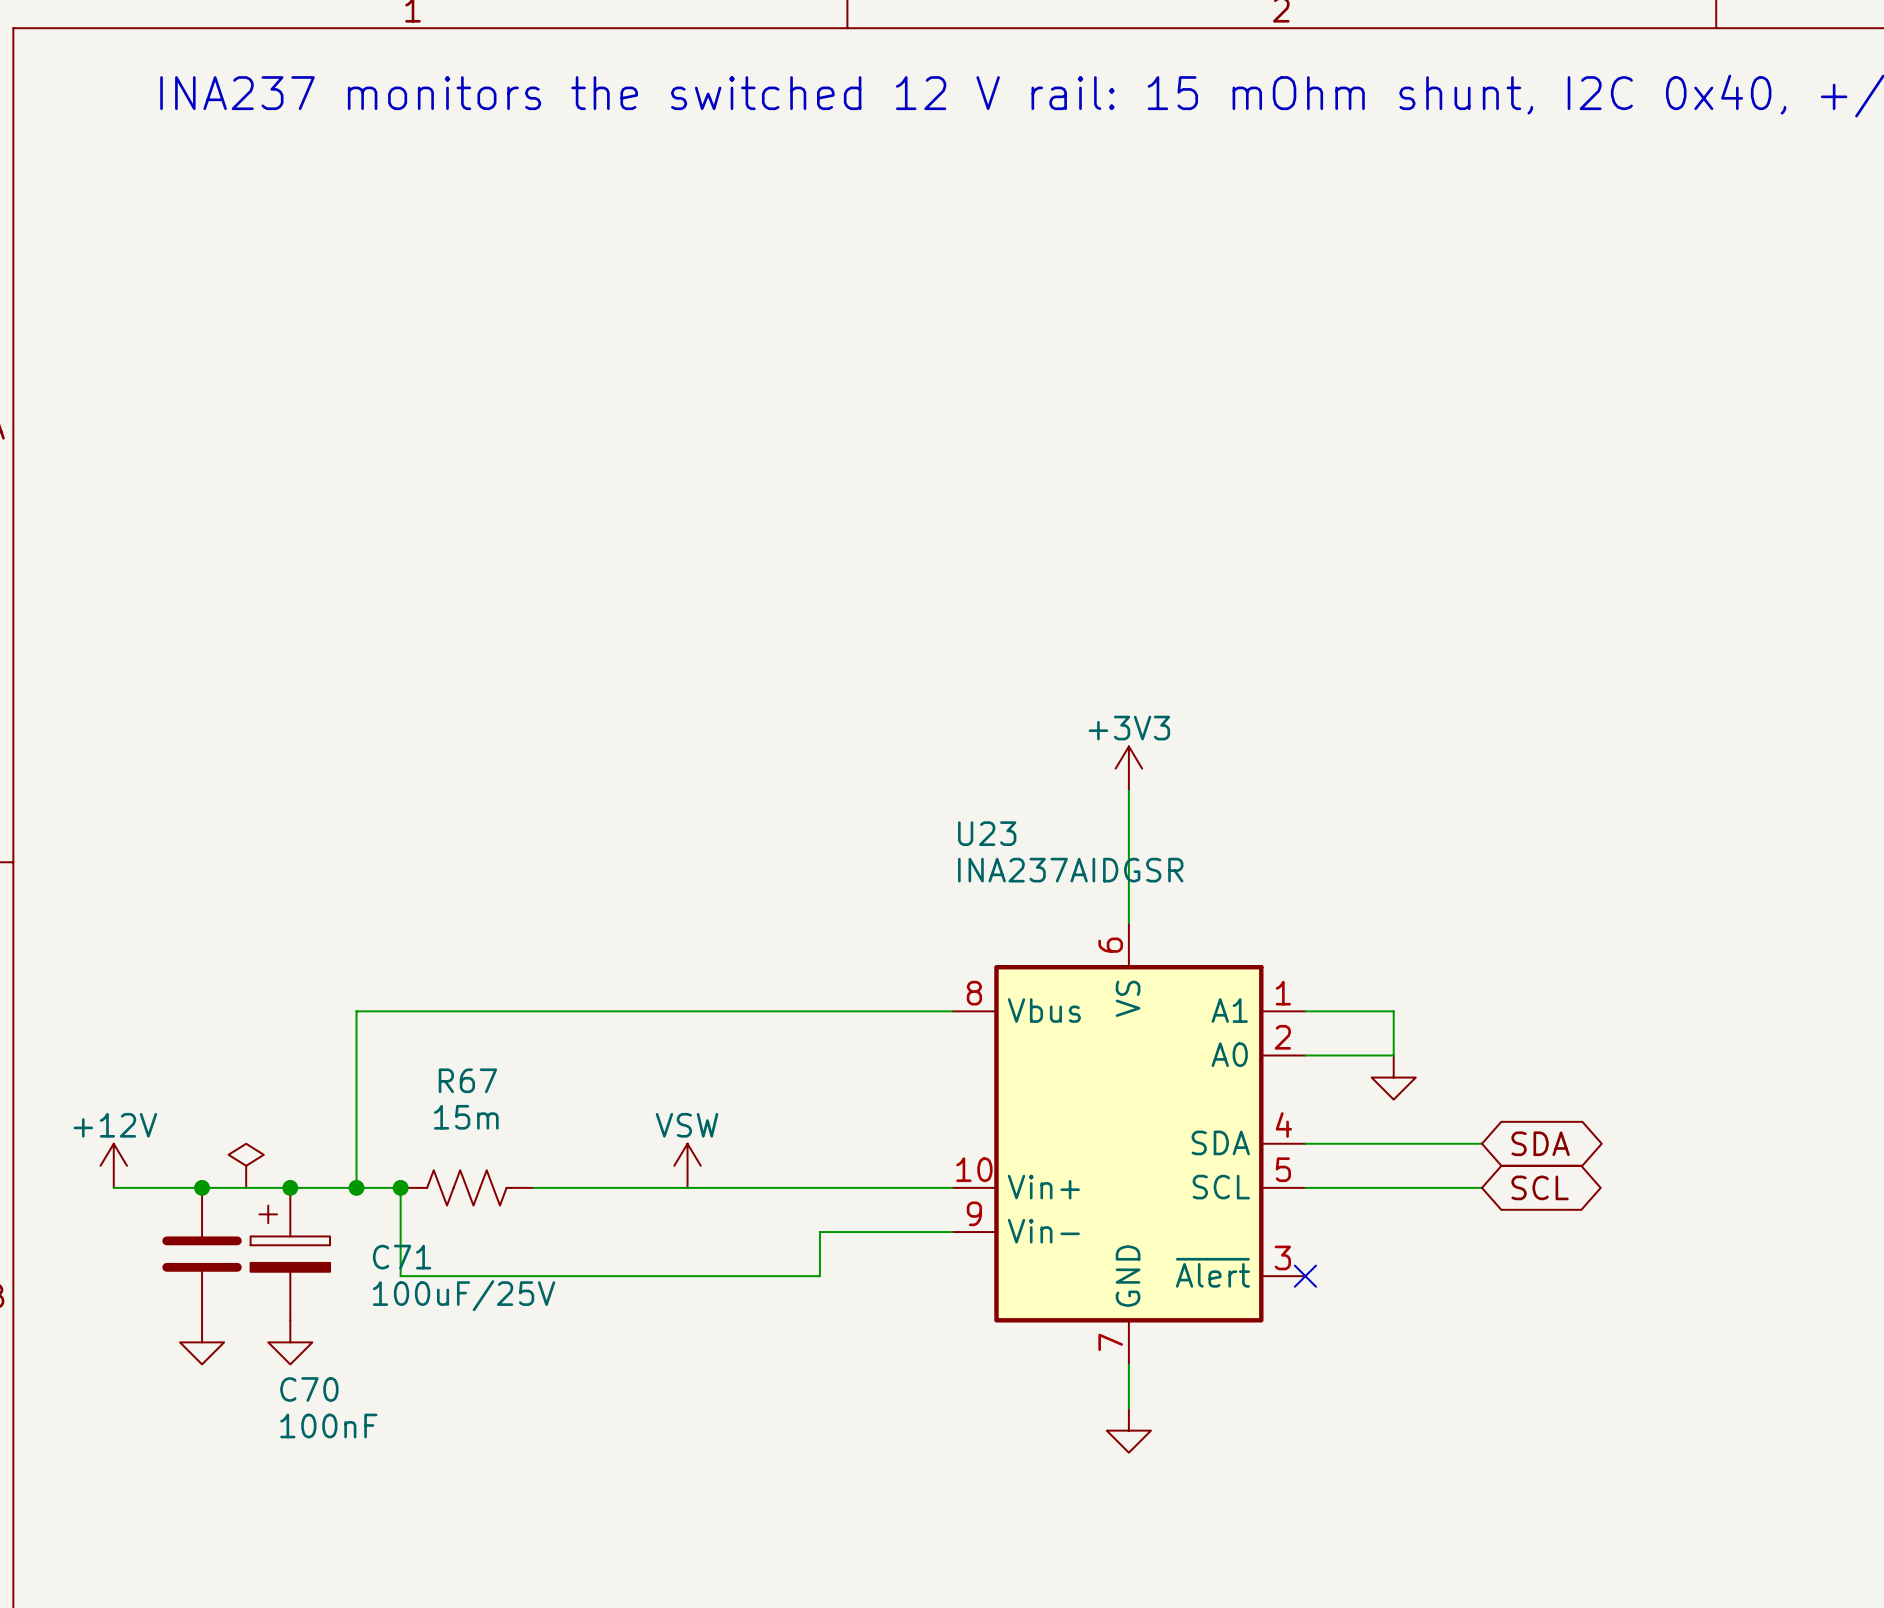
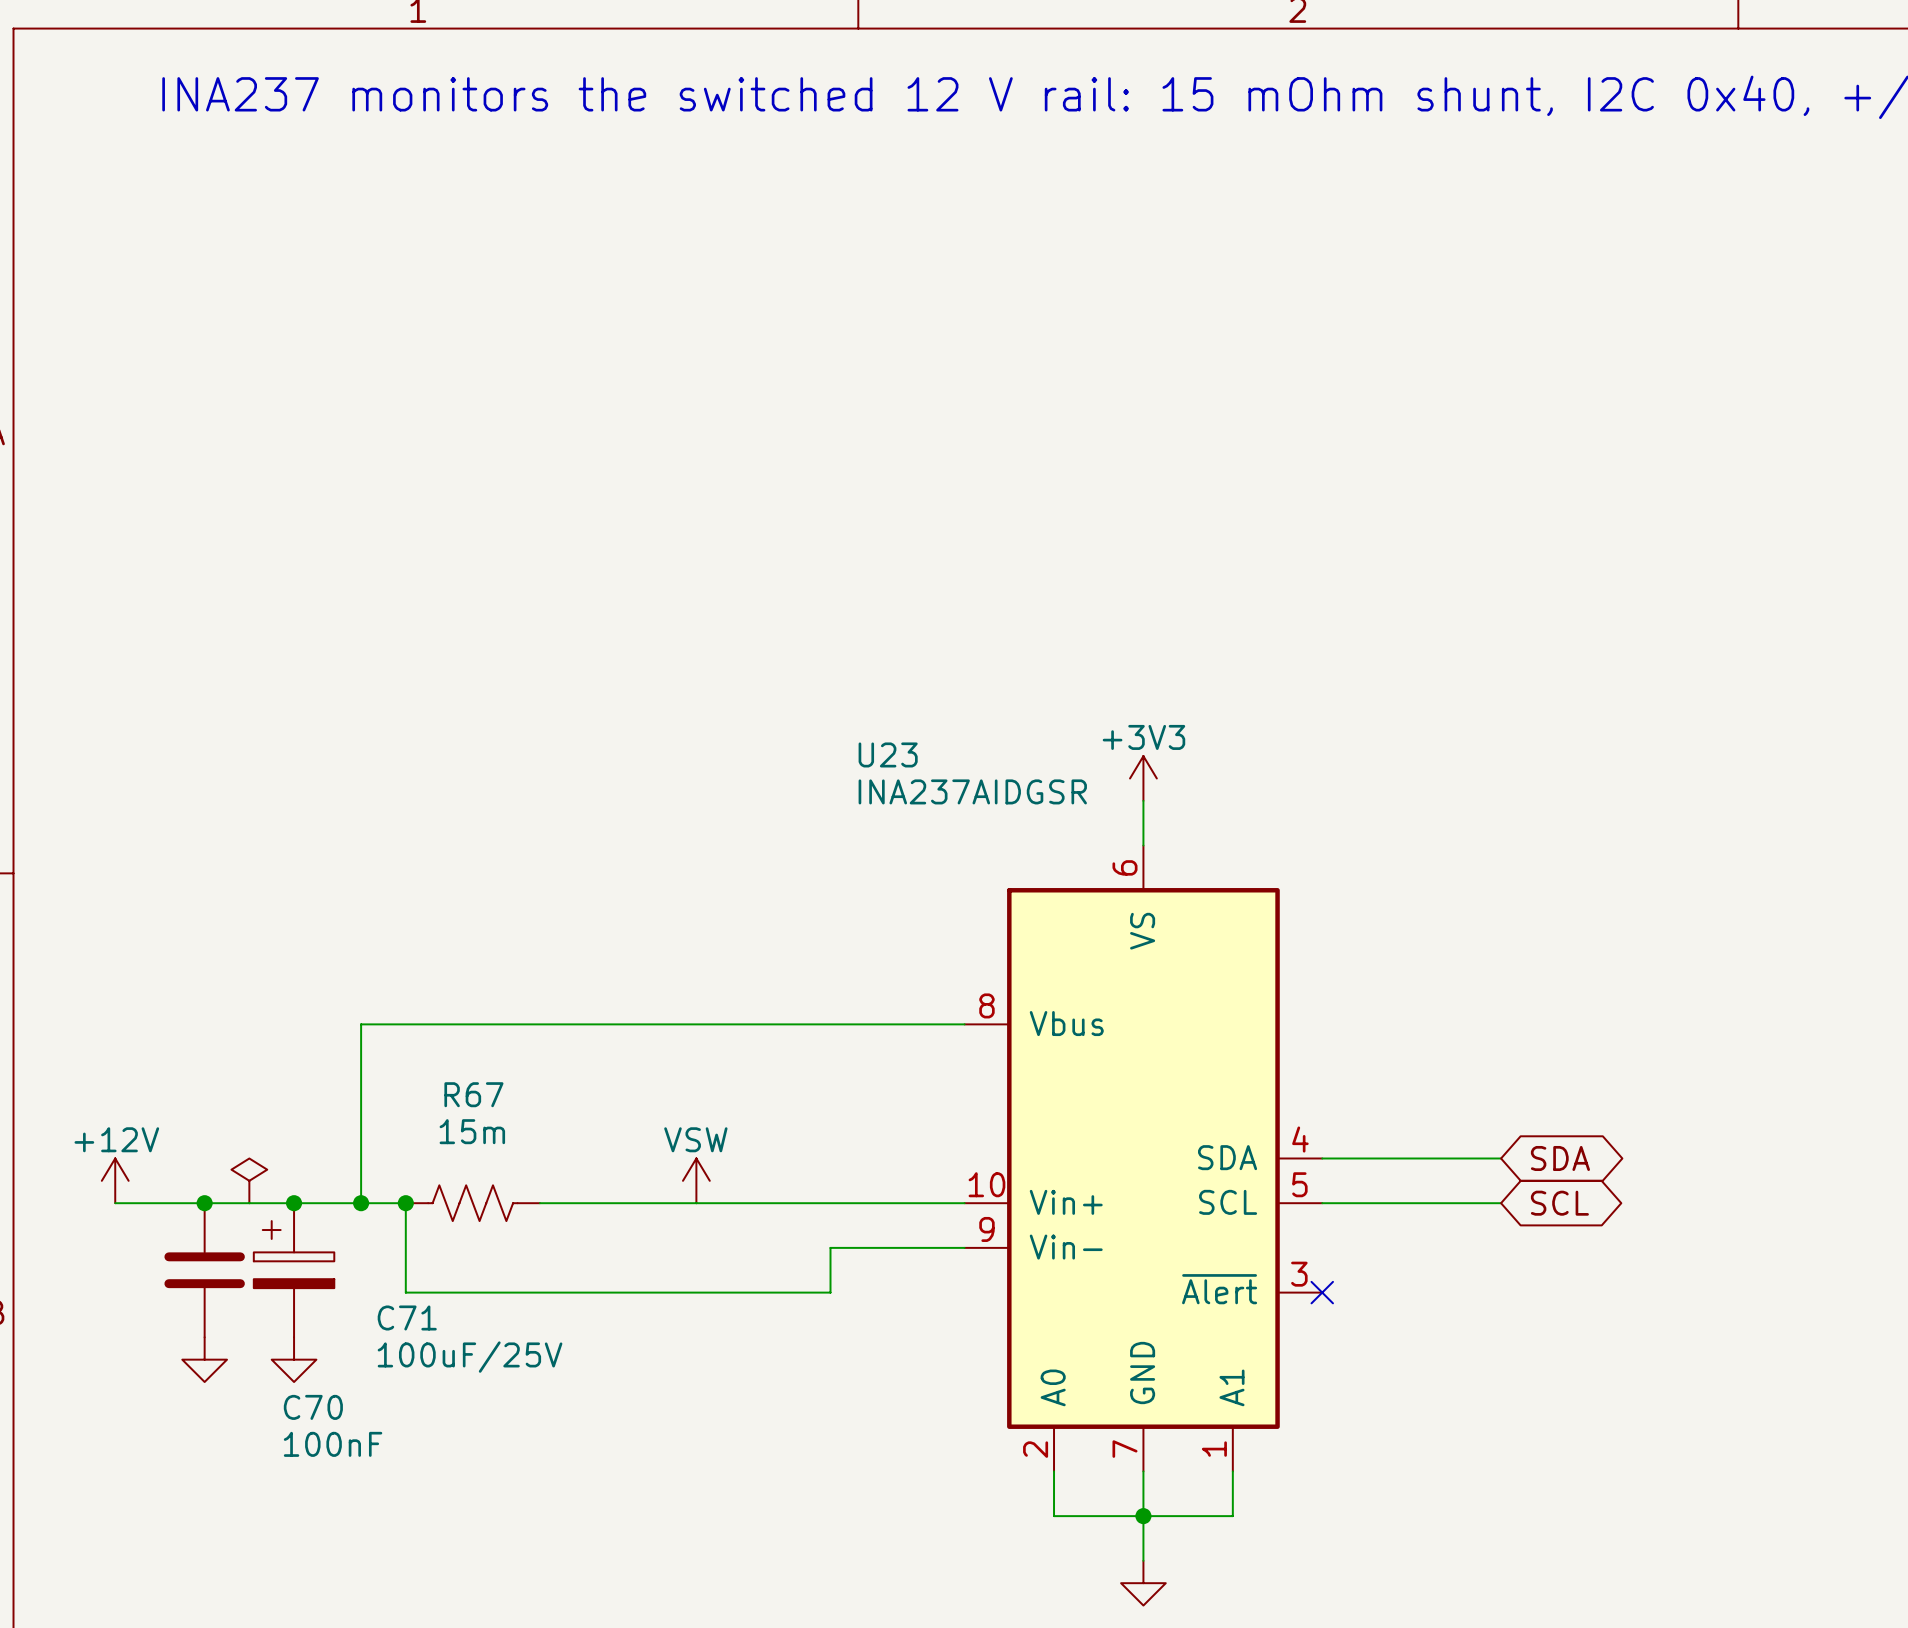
U23 name position: U23 (987, 833) -> U23 (888, 754)
U23 value position: INA237AIDGSR (1070, 870) -> INA237AIDGSR (972, 791)
U23 symbol: [952, 923, 1306, 1365] -> [964, 845, 1323, 1472]
wire: (1305, 1011) (1393, 1011) (1393, 1055) (1305, 1055) -> none
power symbol: (1393, 1077) -> none
C71 name position: C71 (402, 1257) -> C71 (407, 1317)
C71 value position: 100uF/25V (464, 1295) -> 100uF/25V (470, 1357)
power symbol position: (1128, 1430) -> (1143, 1583)
wire: none -> (1054, 1471) (1054, 1516) (1232, 1516) (1232, 1471)
wire: none -> (1143, 1471) (1143, 1560)
junction: none -> (1143, 1516)

